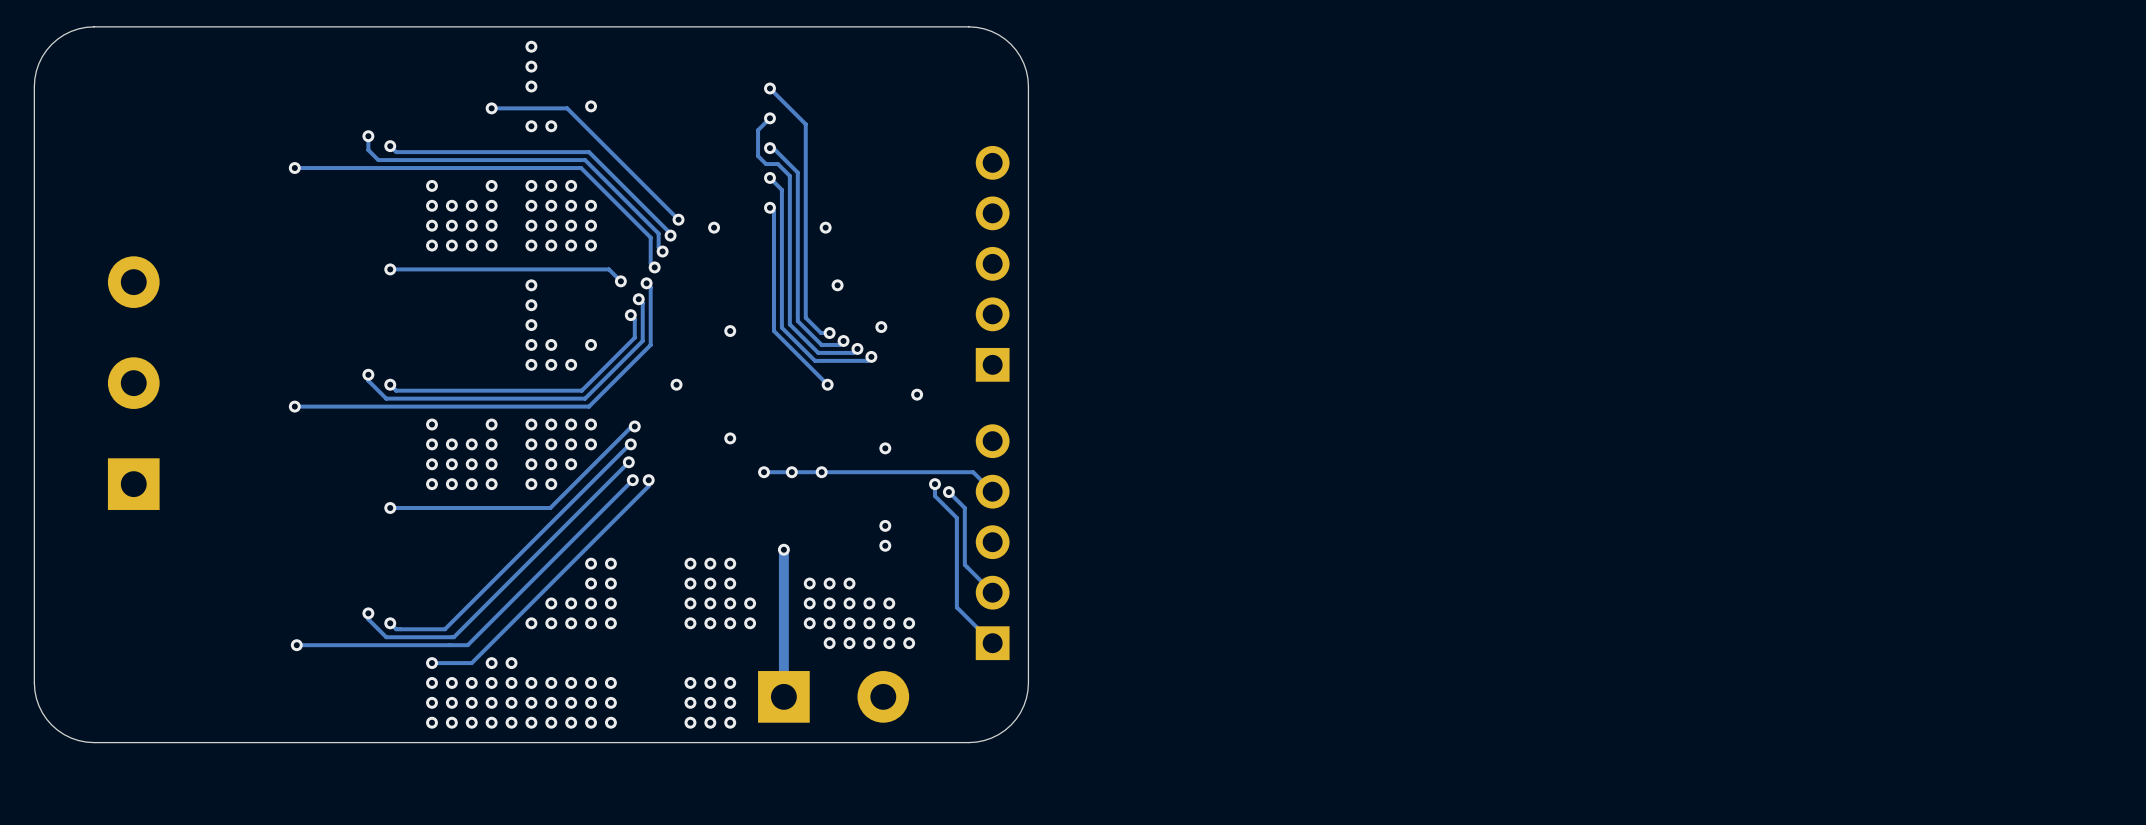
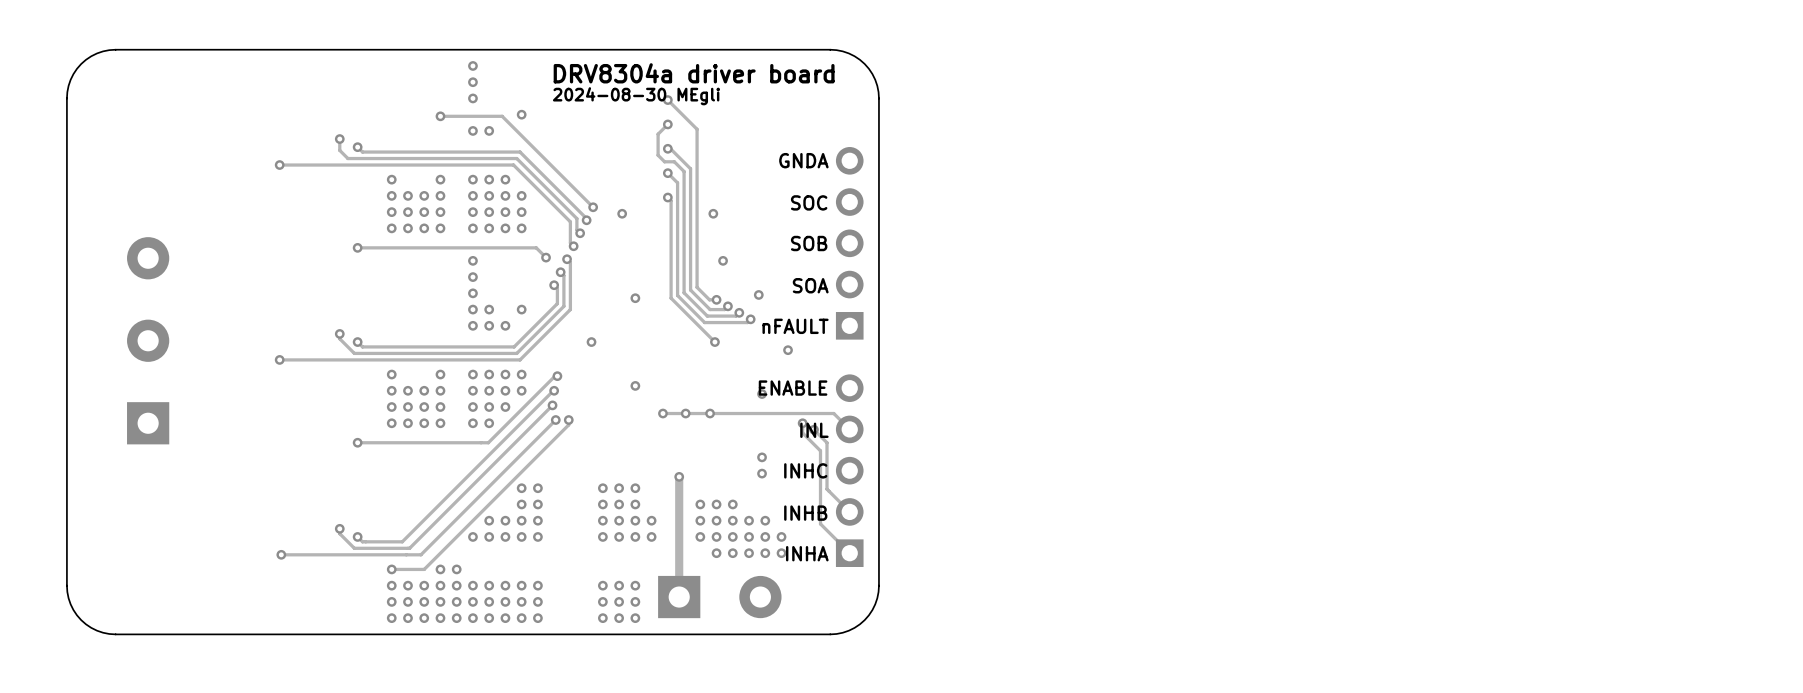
text: none -> DRV8304a driver board (694, 73)
text: none -> 2024-08-30 MEgli (636, 96)
text: none -> GNDA (803, 160)
text: none -> SOC (809, 202)
text: none -> SOB (809, 243)
text: none -> SOA (810, 285)
text: none -> nFAULT (795, 326)
text: none -> ENABLE (793, 388)
text: none -> INL (814, 430)
text: none -> INHC (805, 470)
text: none -> INHB (805, 513)
text: none -> INHA (807, 553)

